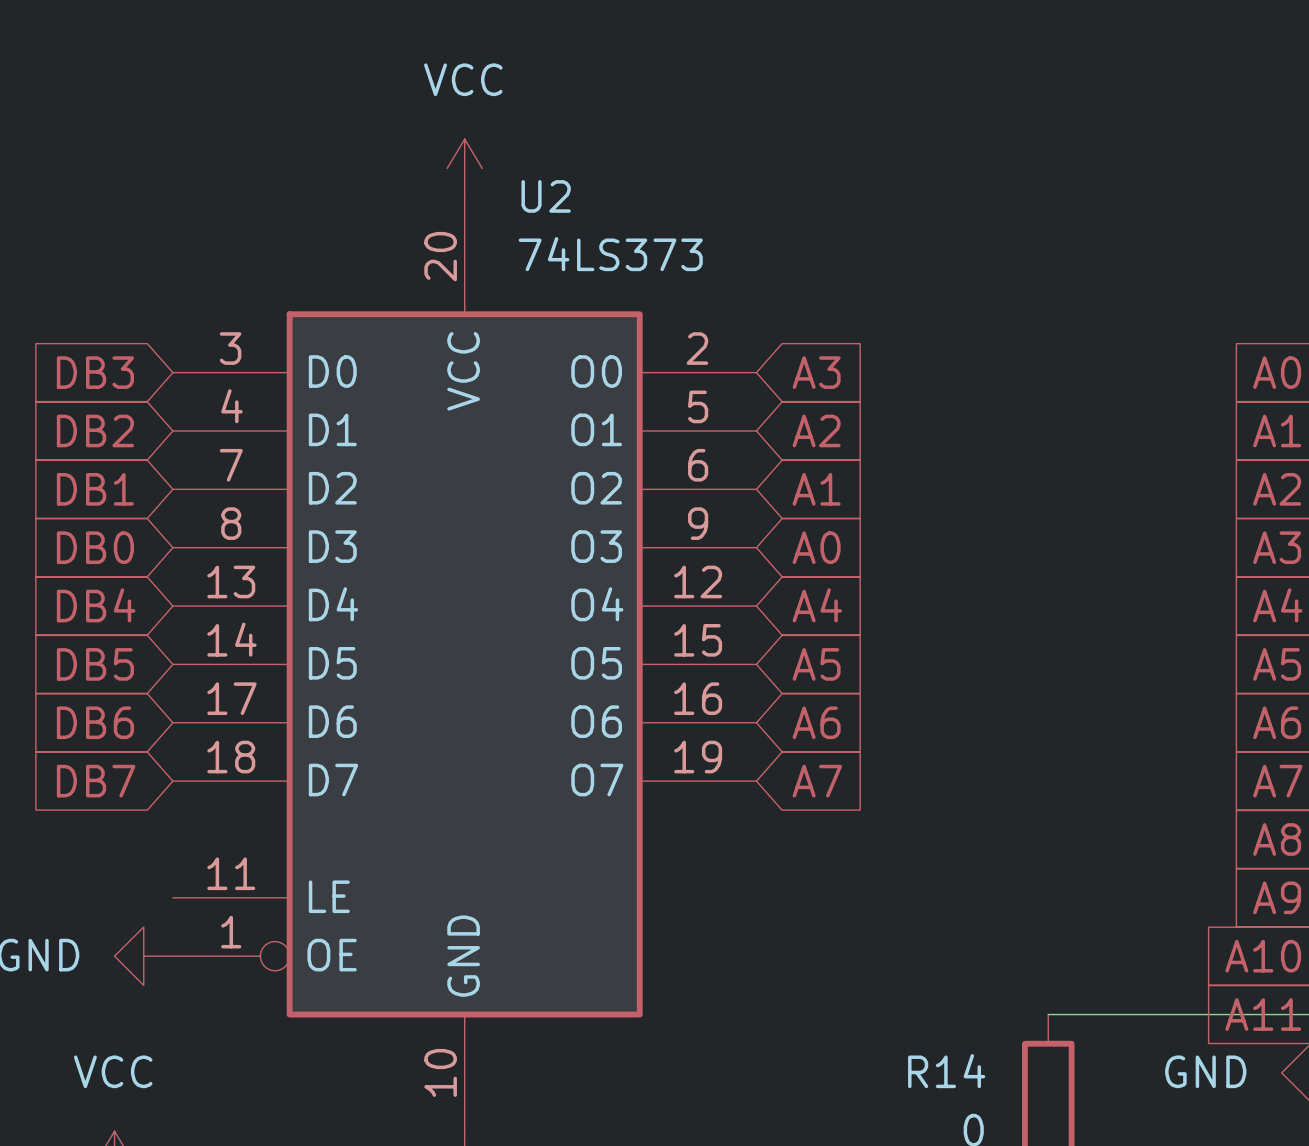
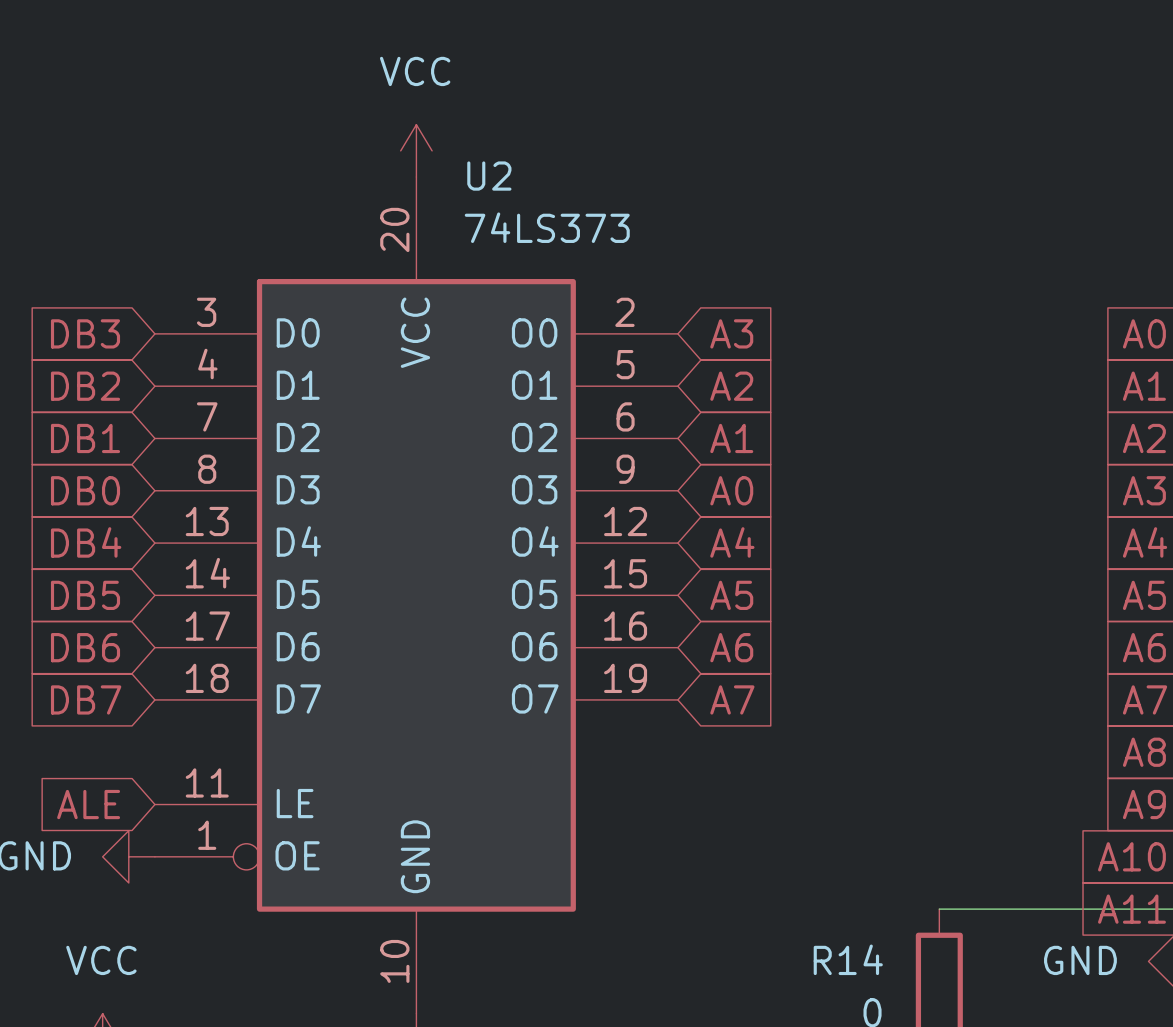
global label: none -> ALE (88, 804)

